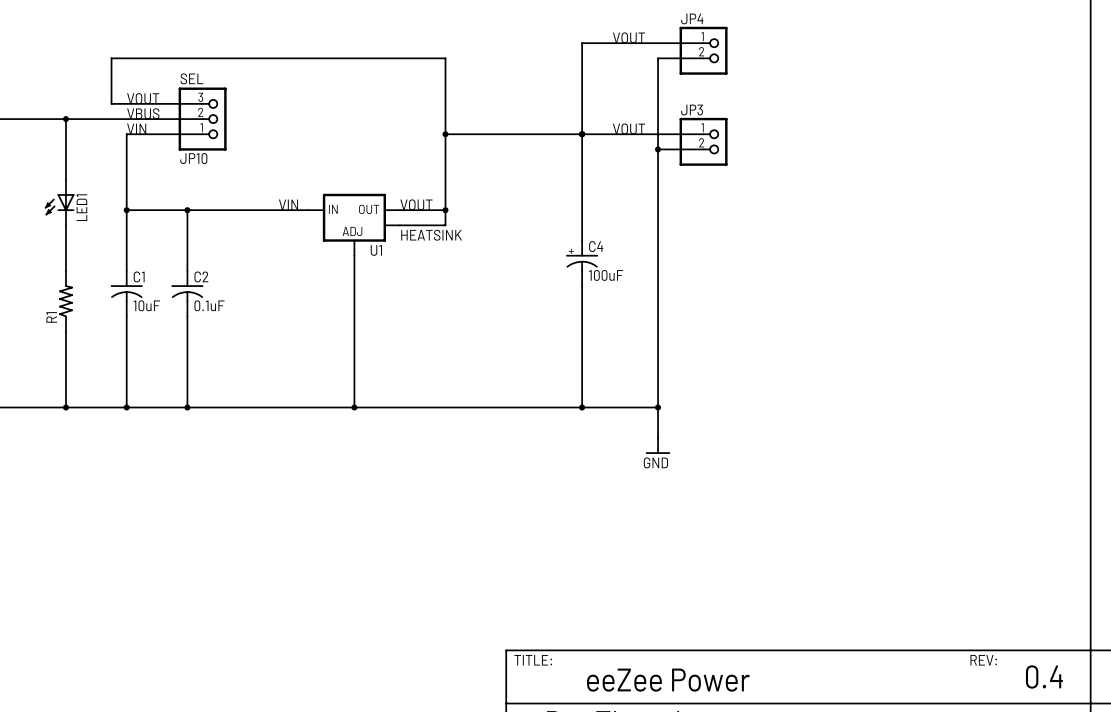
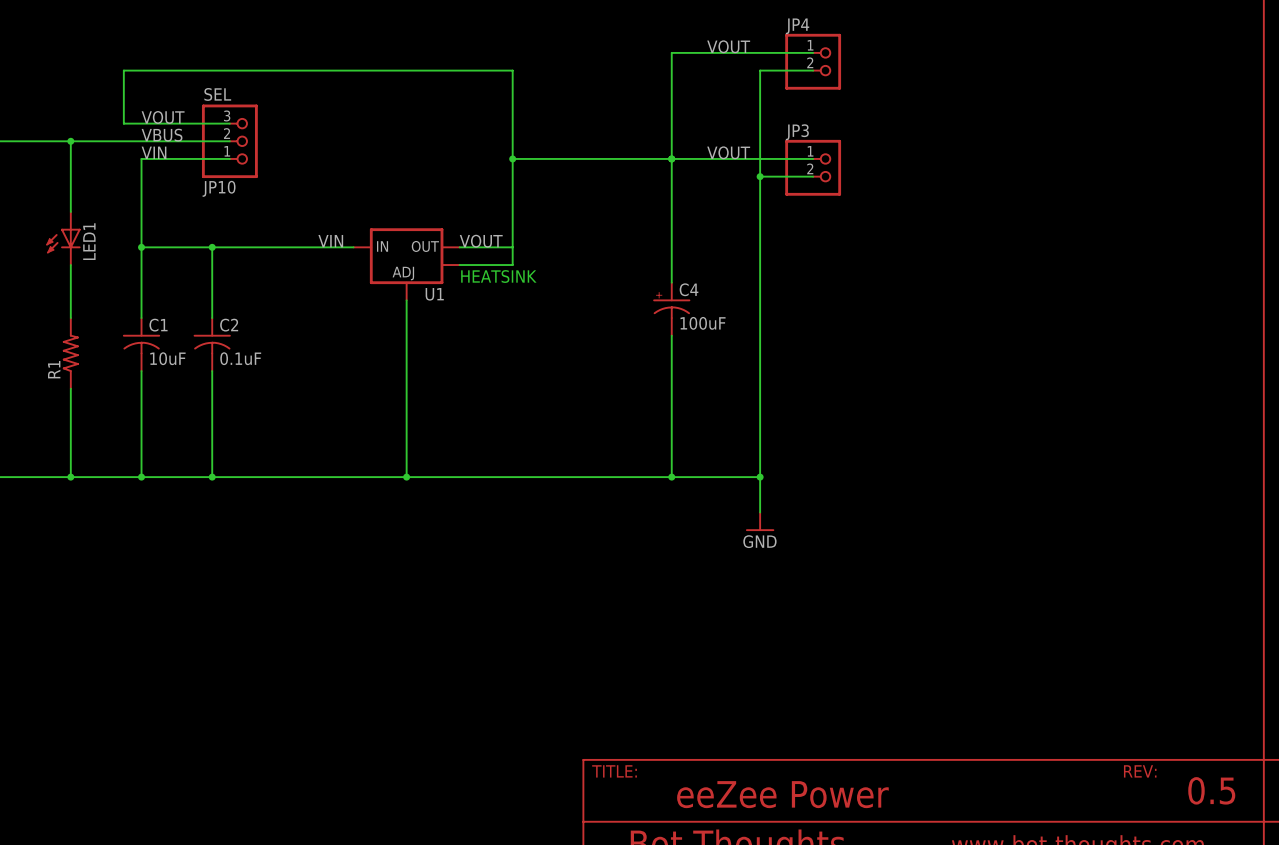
junction: (445, 210) -> none
text: 0.4 (1044, 676) -> 0.5 (1211, 790)

